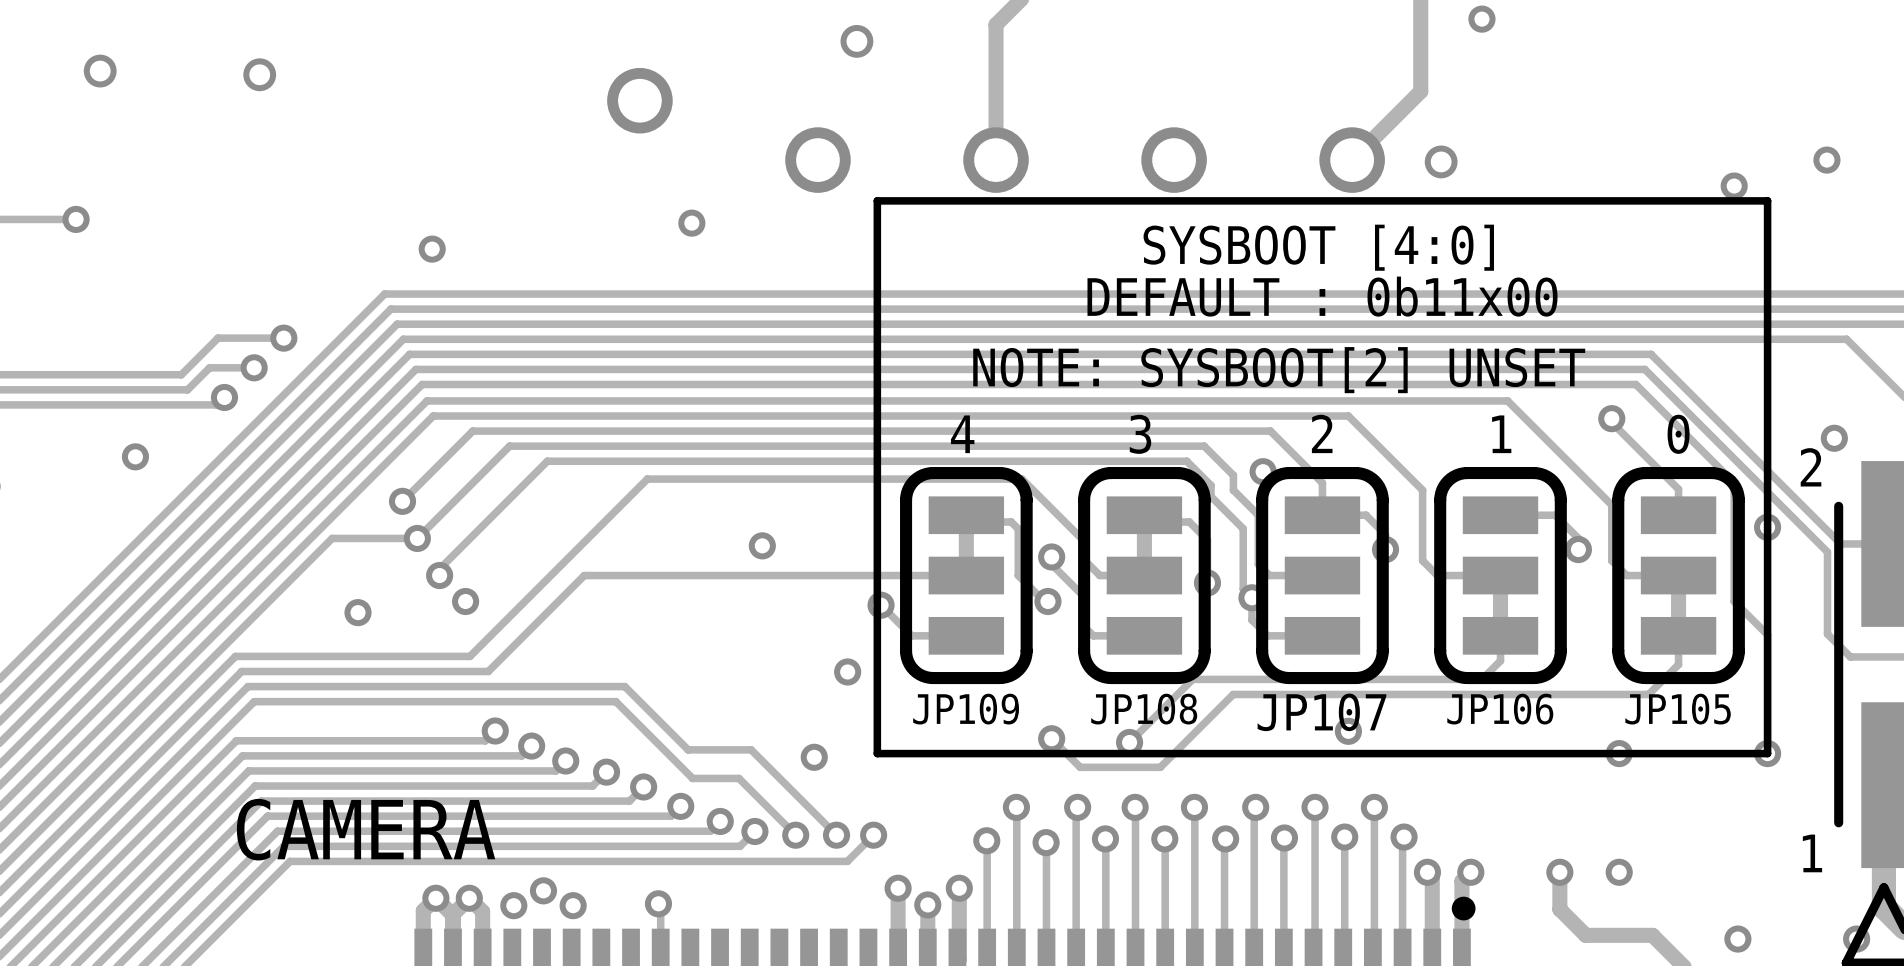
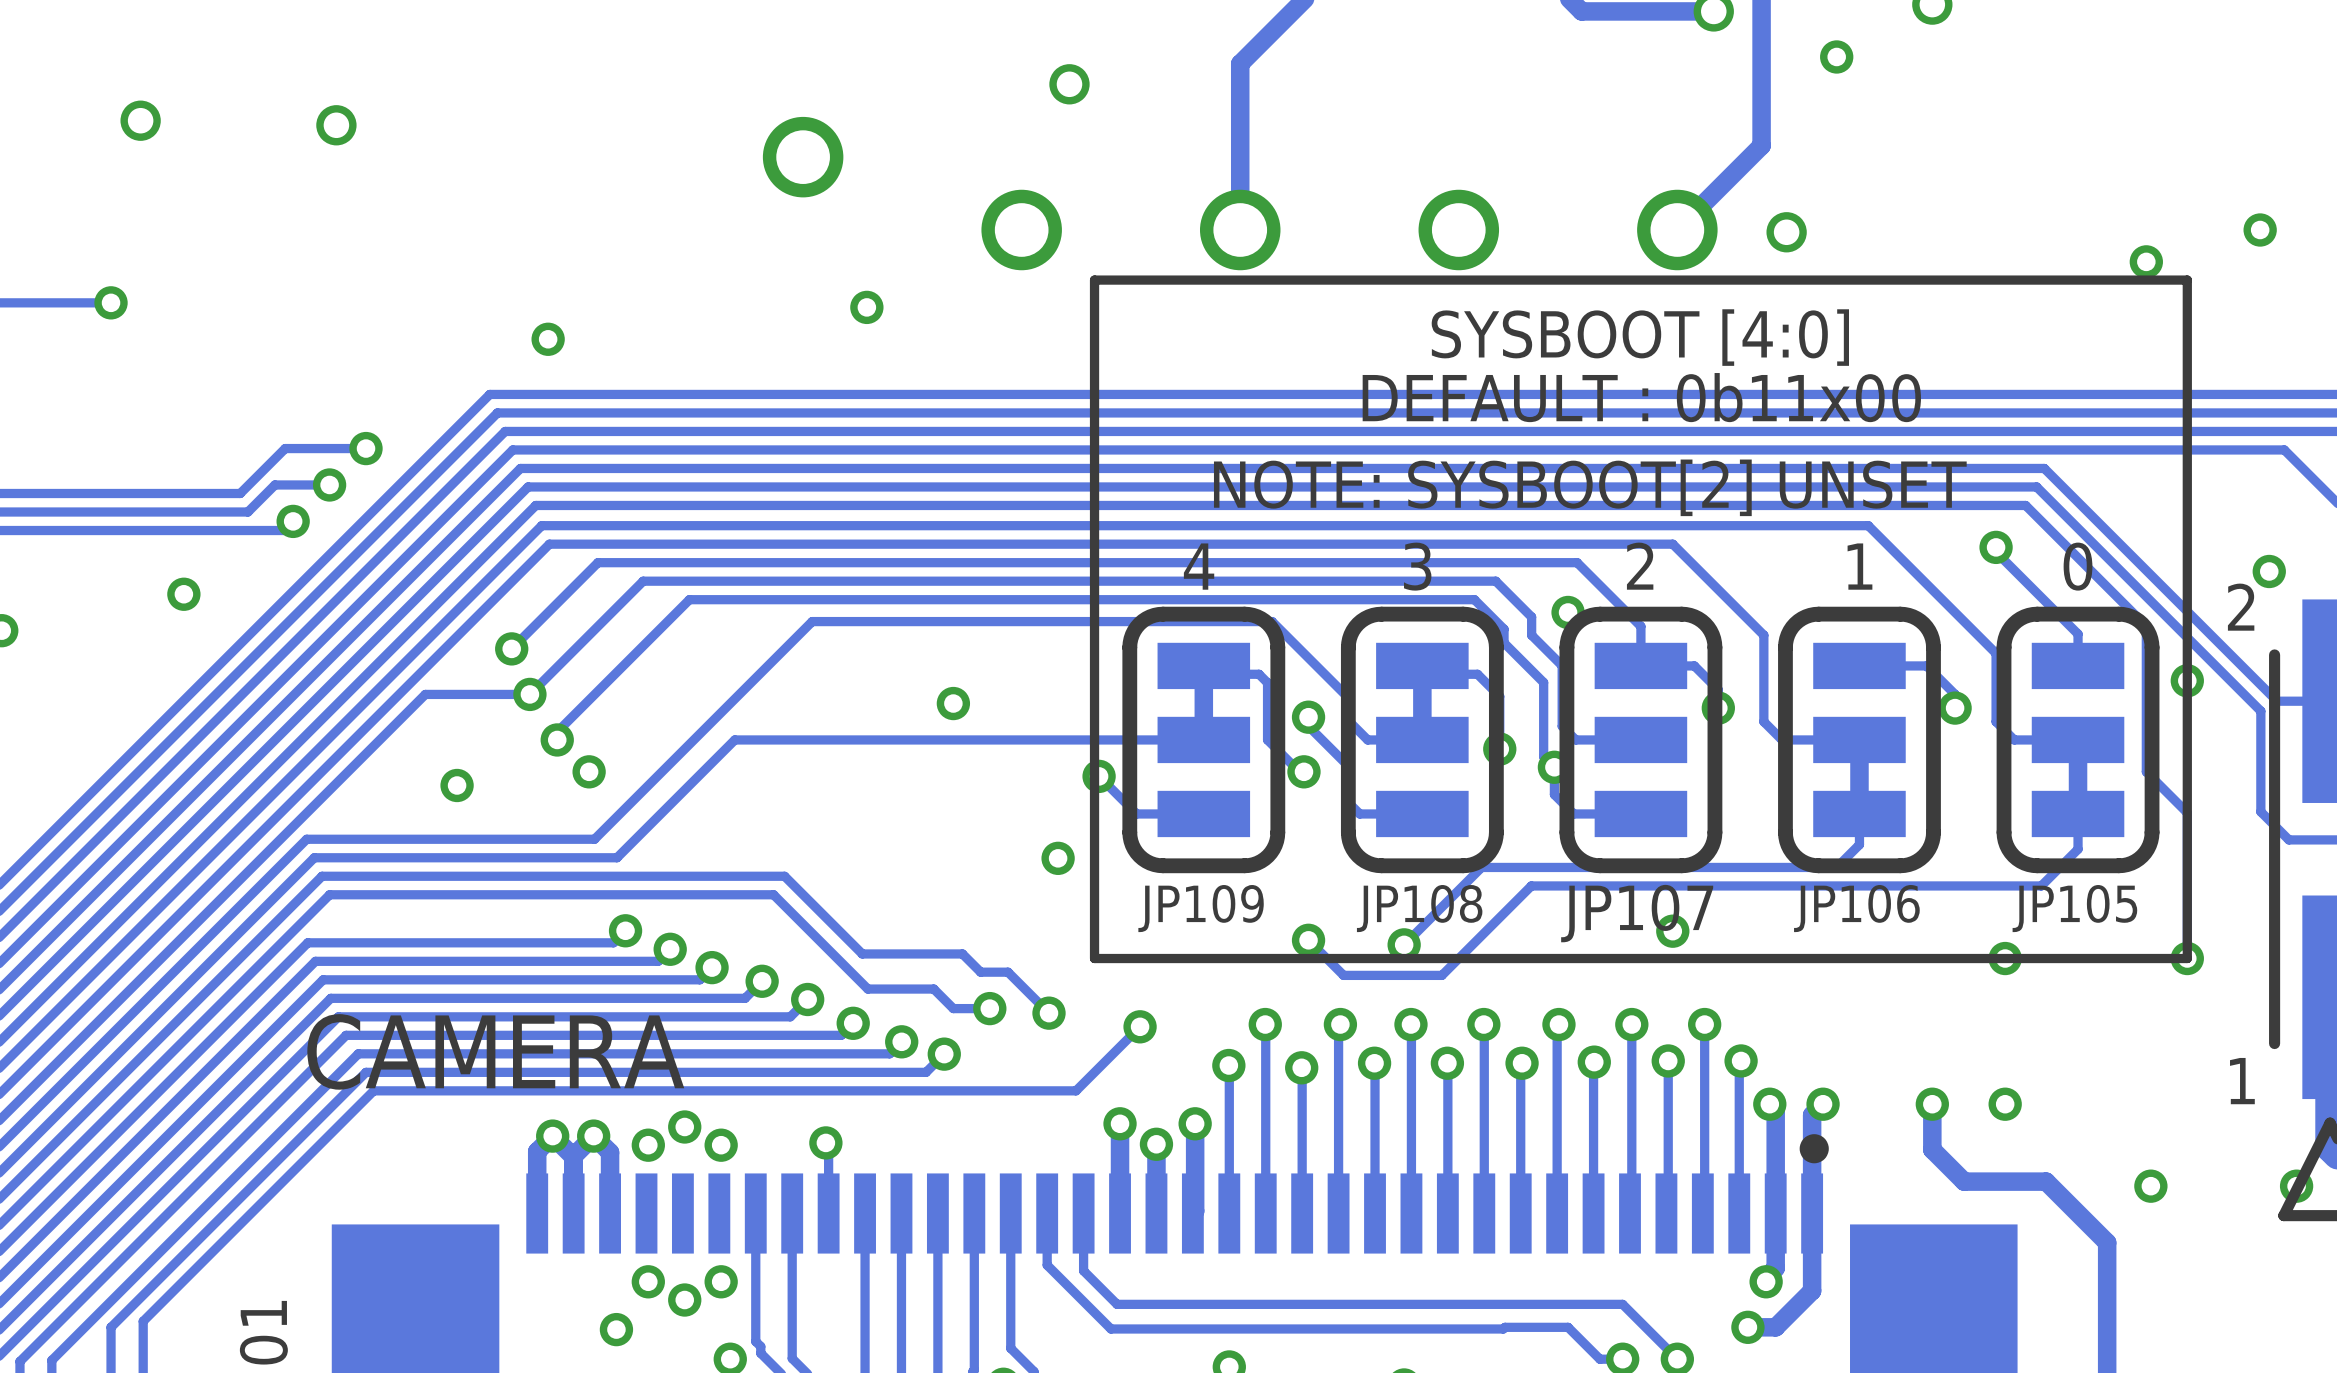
track: (751, 749) (836, 835) -> (939, 953) (962, 953) (980, 972) (1008, 972) (1049, 1013)
via: (814, 757) -> none
track: (738, 778) (795, 835) -> (924, 989) (933, 989) (953, 1008) (989, 1008)
via: none -> (989, 1008)
via: none -> (1049, 1013)
via: none -> (1140, 1026)
via: (795, 835) -> none
via: (836, 835) -> none
track: (873, 835) (847, 861) -> (1140, 1026) (1076, 1090) (1057, 1090)
via: (873, 835) -> none

